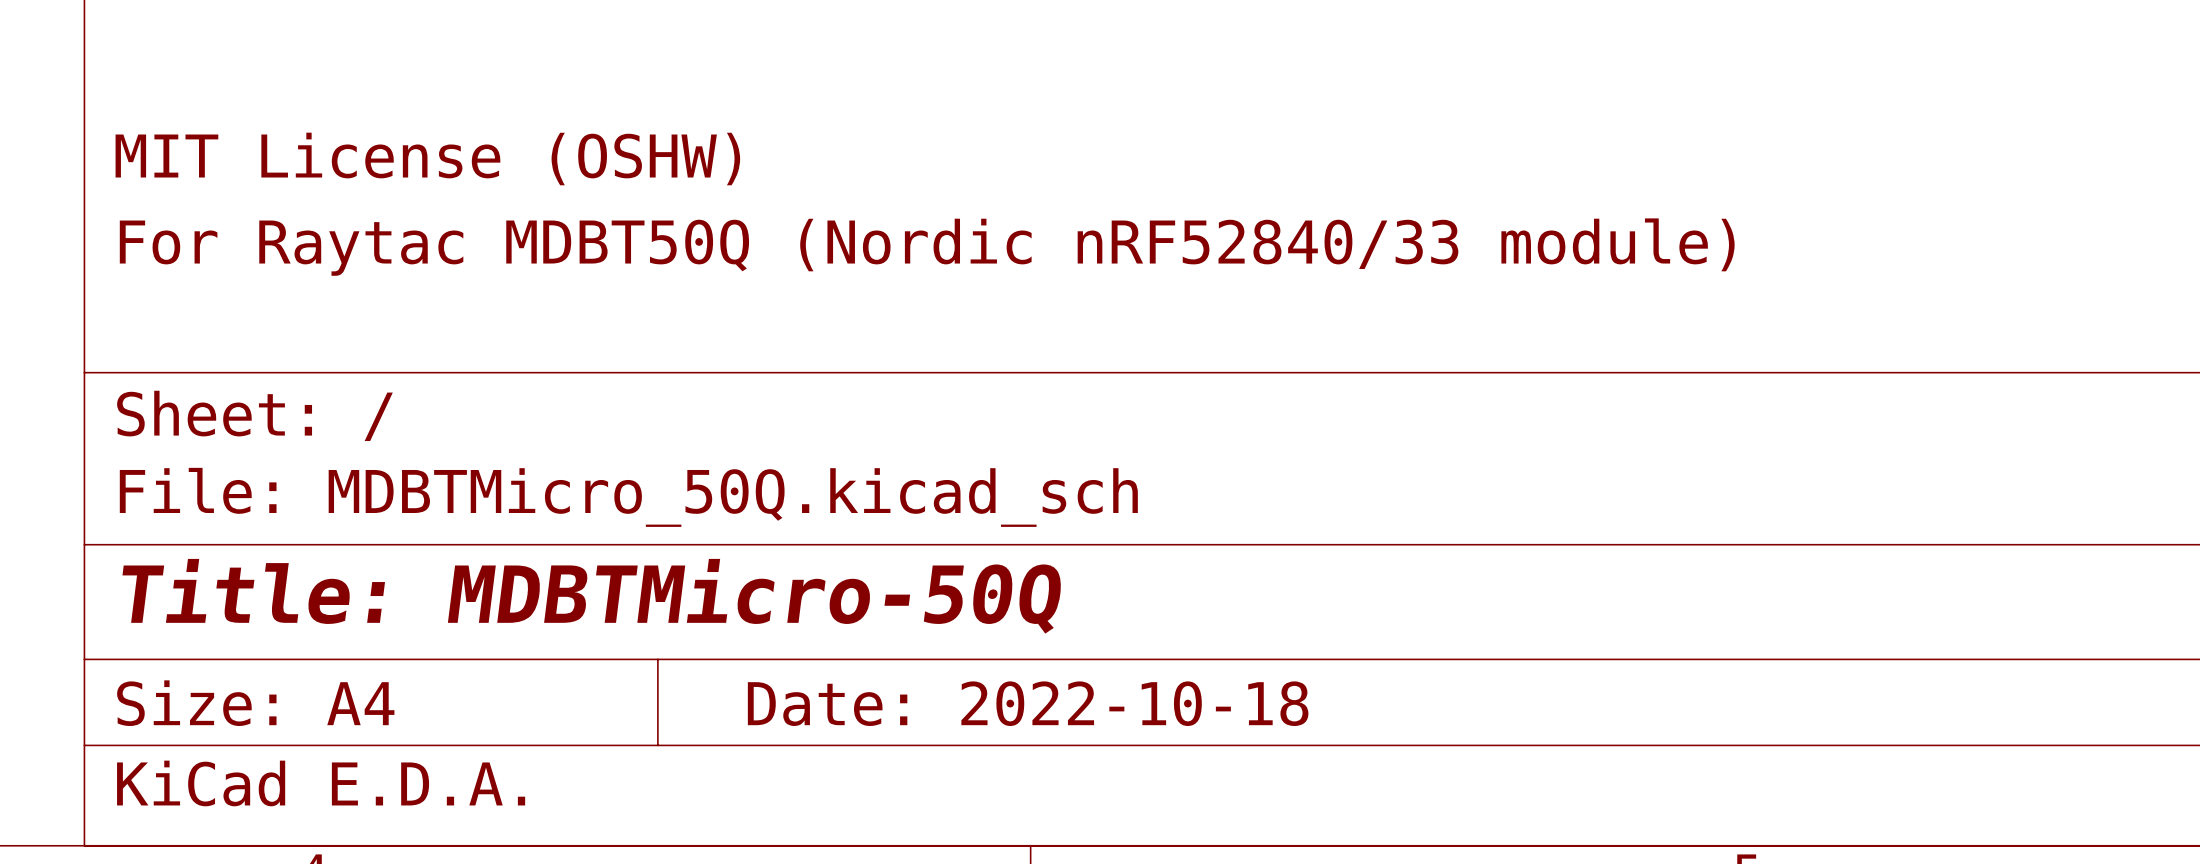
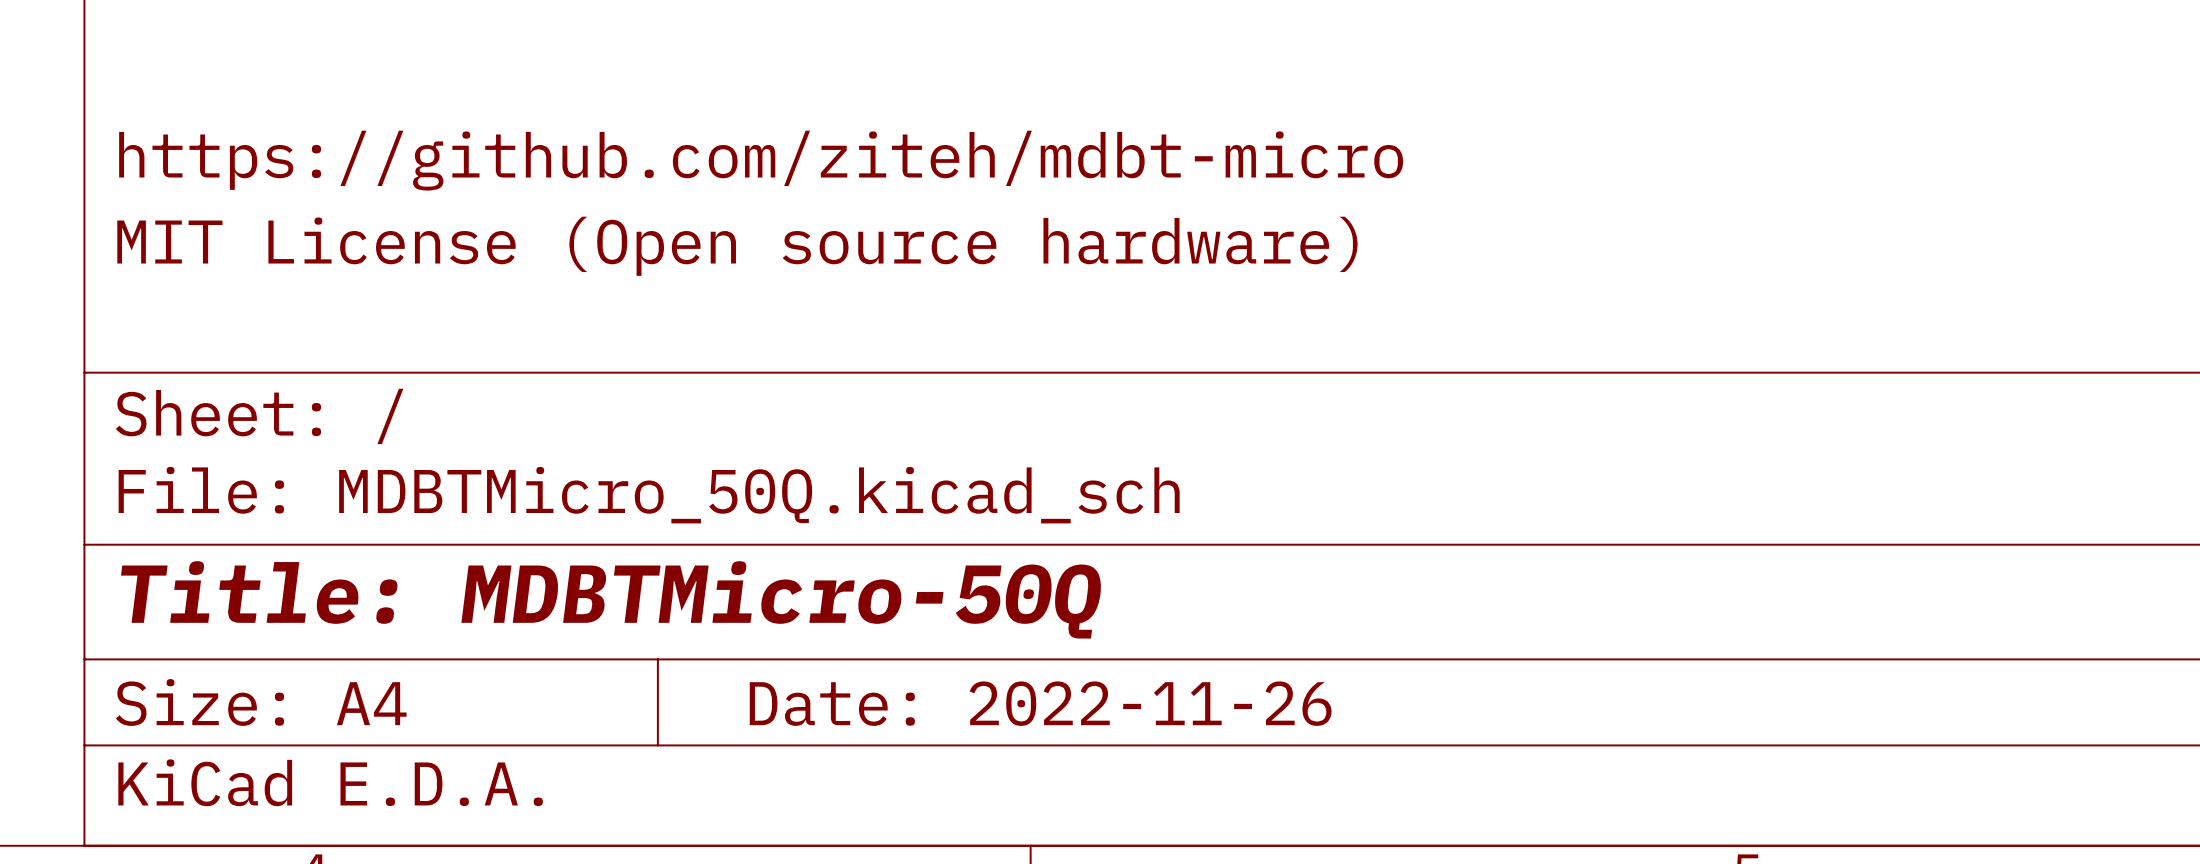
title block: MIT License (OSHW) (427, 158) -> https://github.com/ziteh/mdbt-micro (761, 160)
title block: For Raytac MDBT50Q (Nordic nRF52840/33 module) (927, 247) -> MIT License (Open source hardware) (737, 246)
title block: Date: 2022-10-18 (1028, 703) -> Date: 2022-11-26 (1040, 703)

